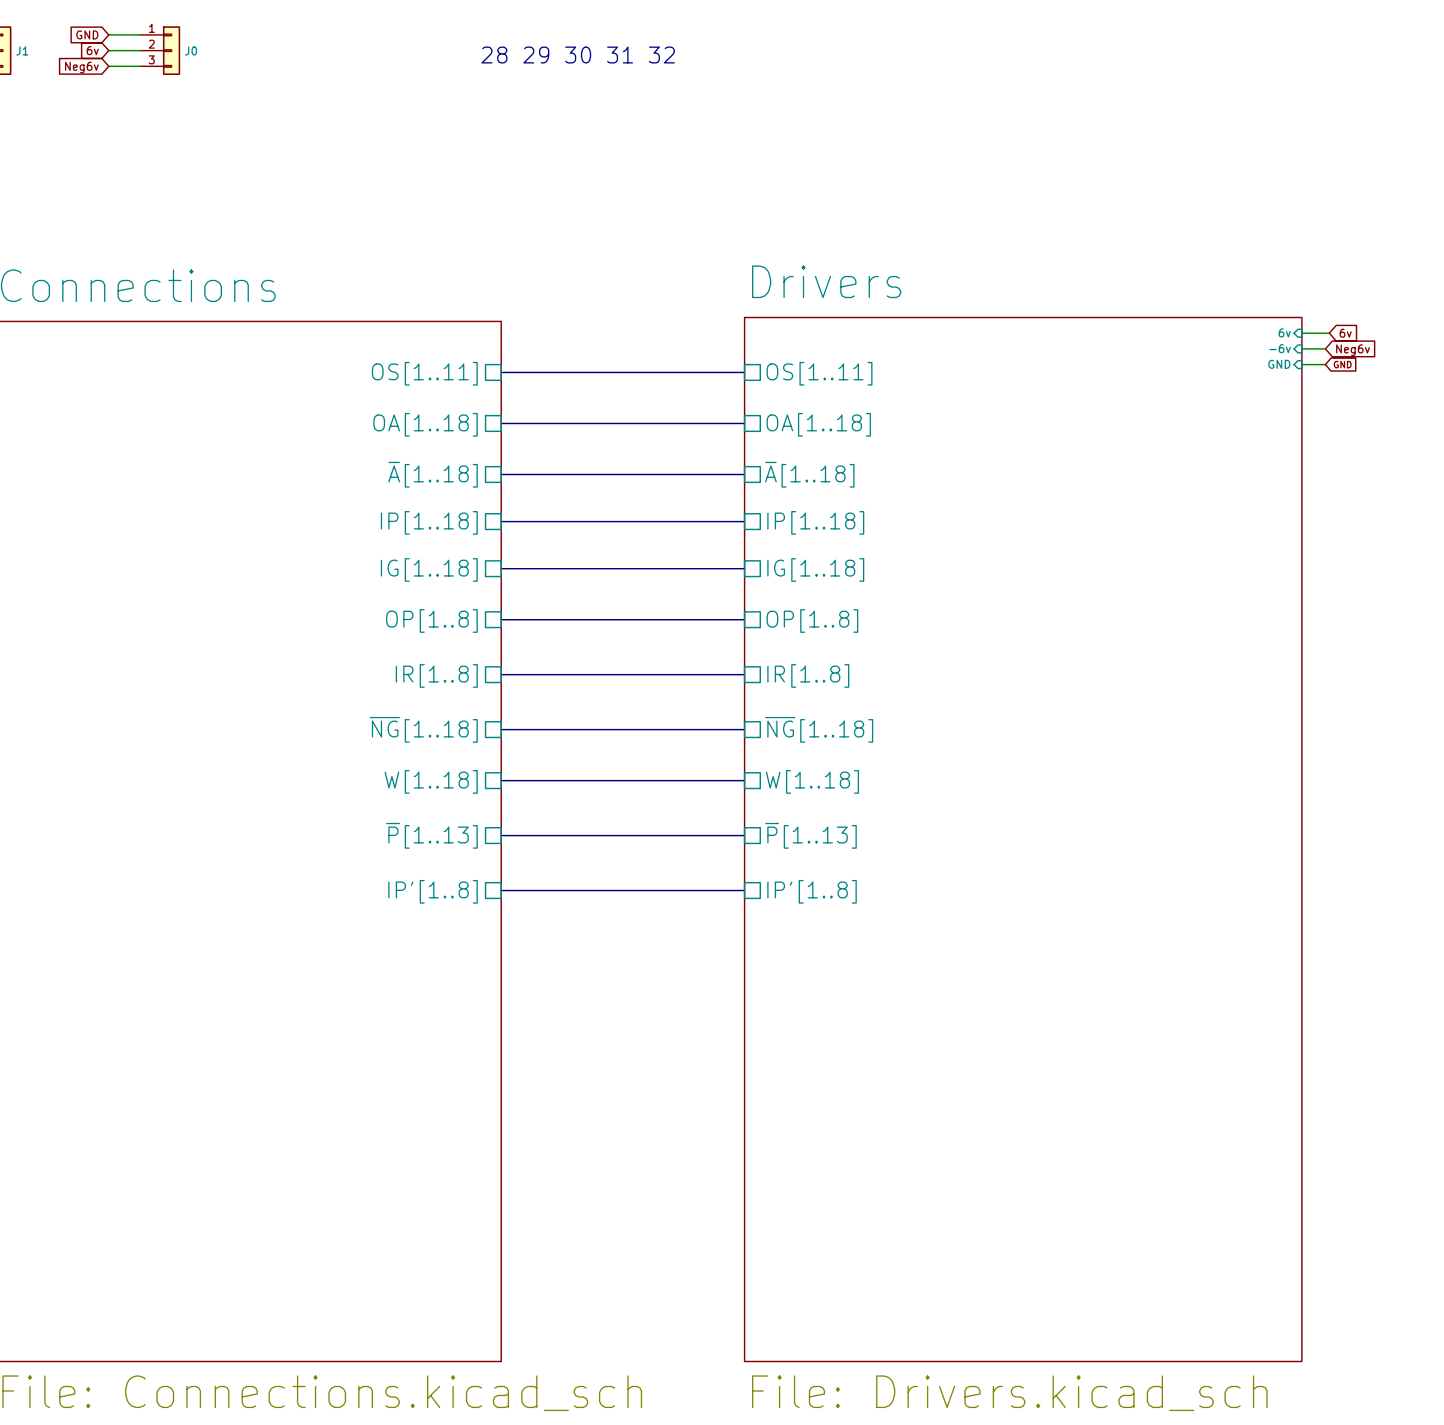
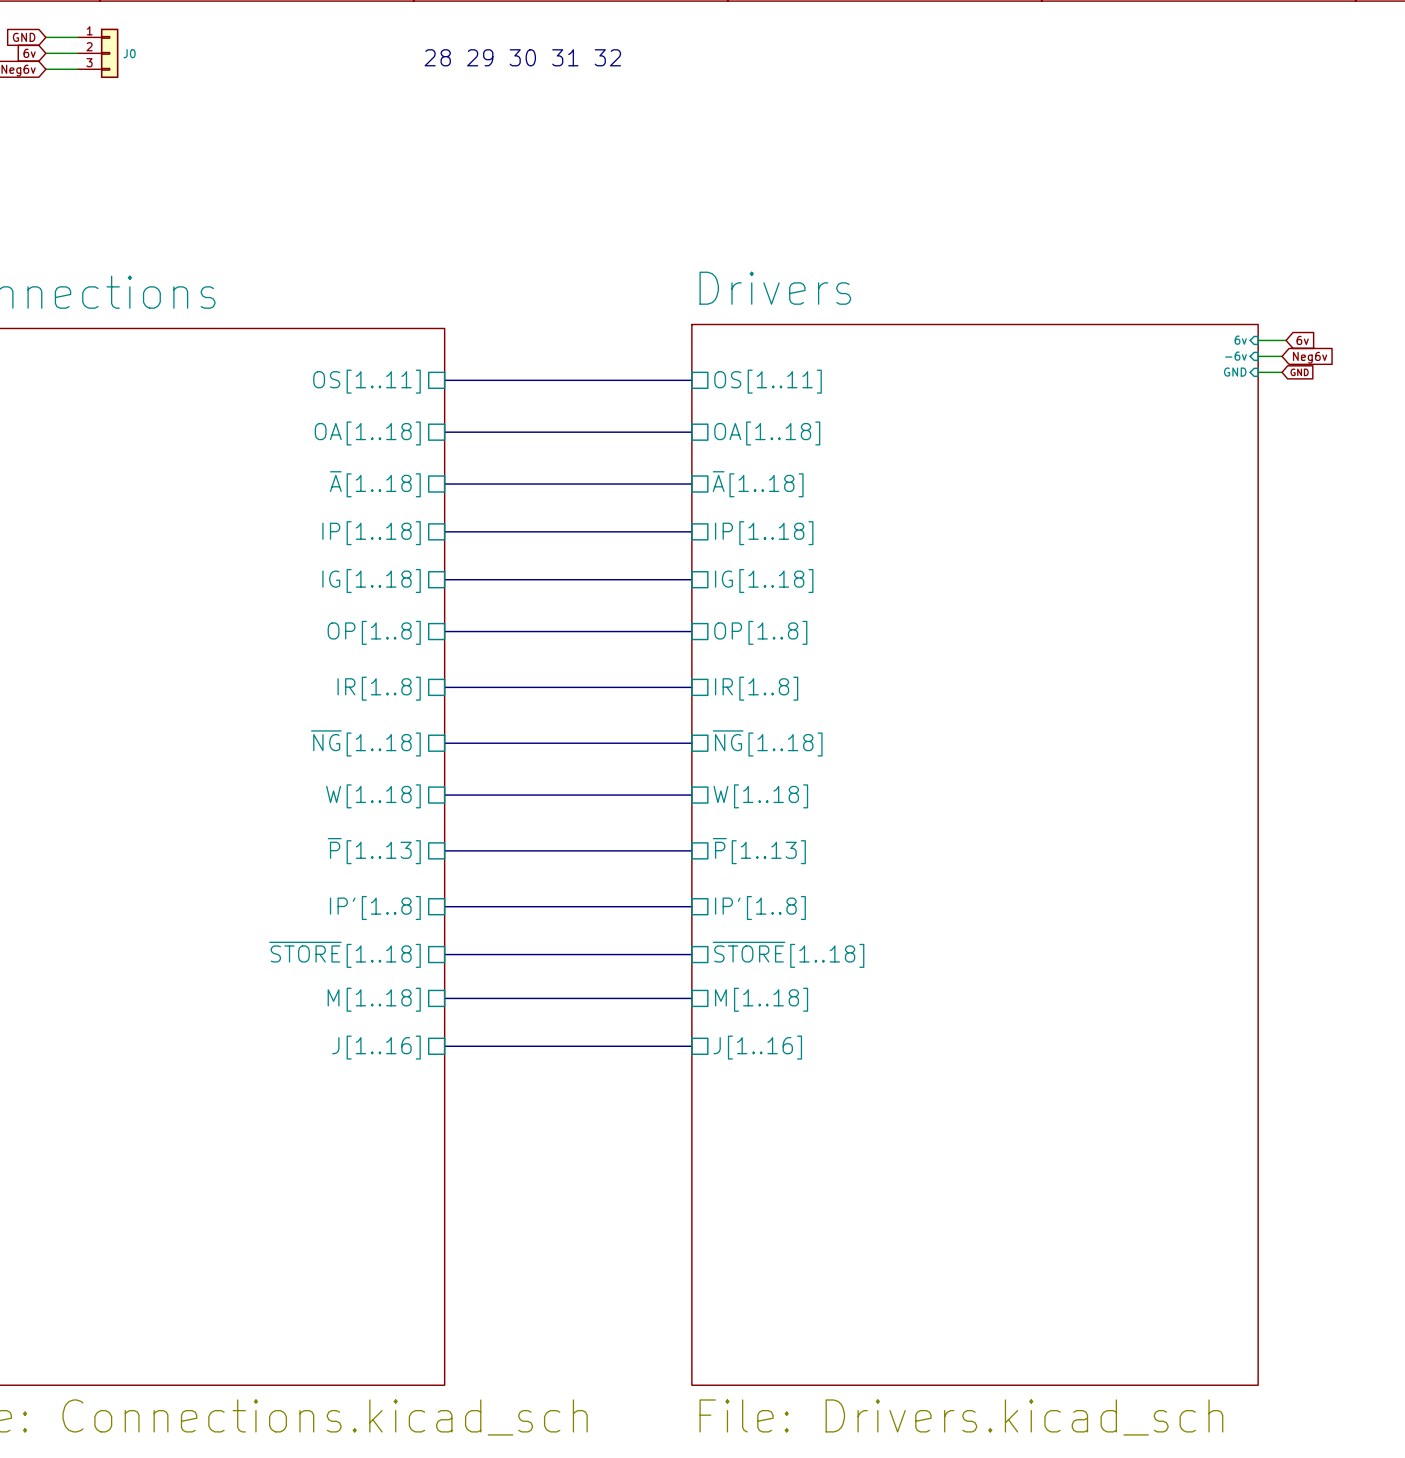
sheet pin: none -> ~{STORE}[1..18] (344, 954)
bus: none -> (444, 954) (691, 954)
sheet pin: none -> ~{STORE}[1..18] (788, 954)
bus: none -> (444, 998) (691, 998)
sheet pin: none -> M[1..18] (374, 999)
sheet pin: none -> M[1..18] (761, 999)
bus: none -> (444, 1046) (691, 1046)
sheet pin: none -> J[1..16] (376, 1047)
sheet pin: none -> J[1..16] (757, 1047)

